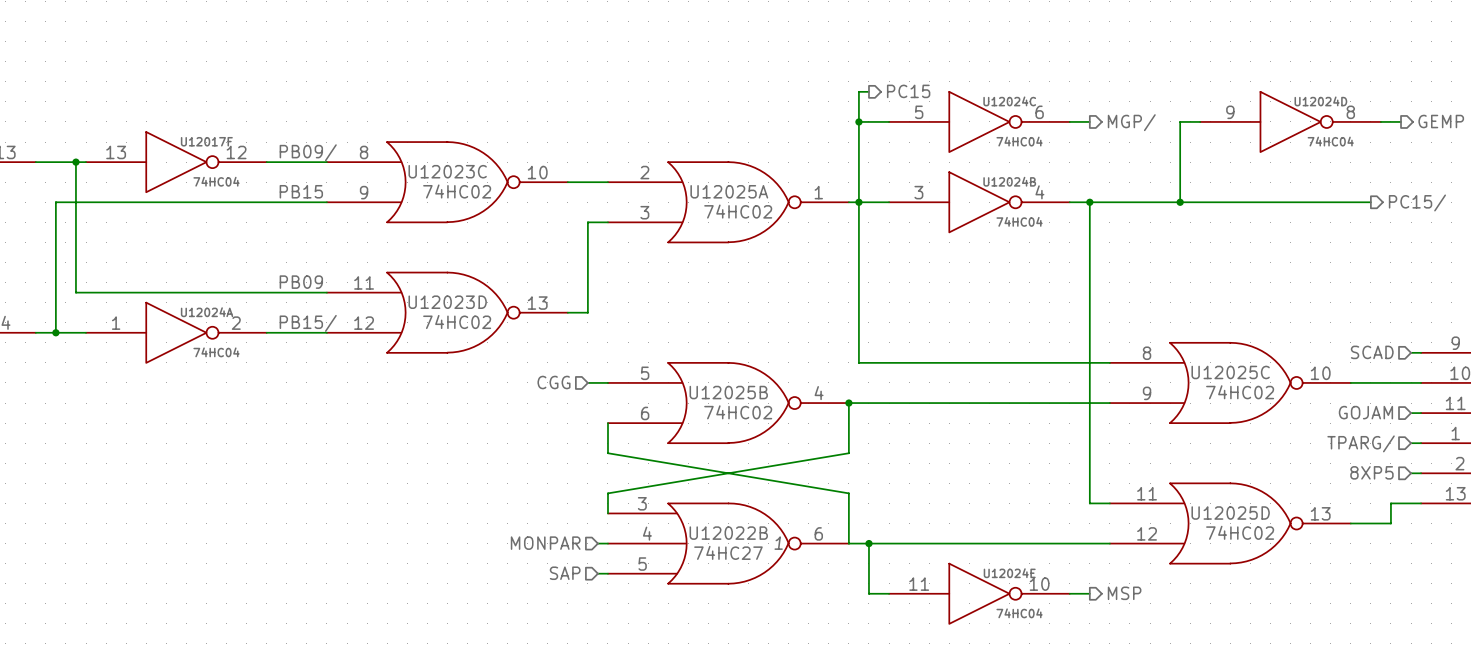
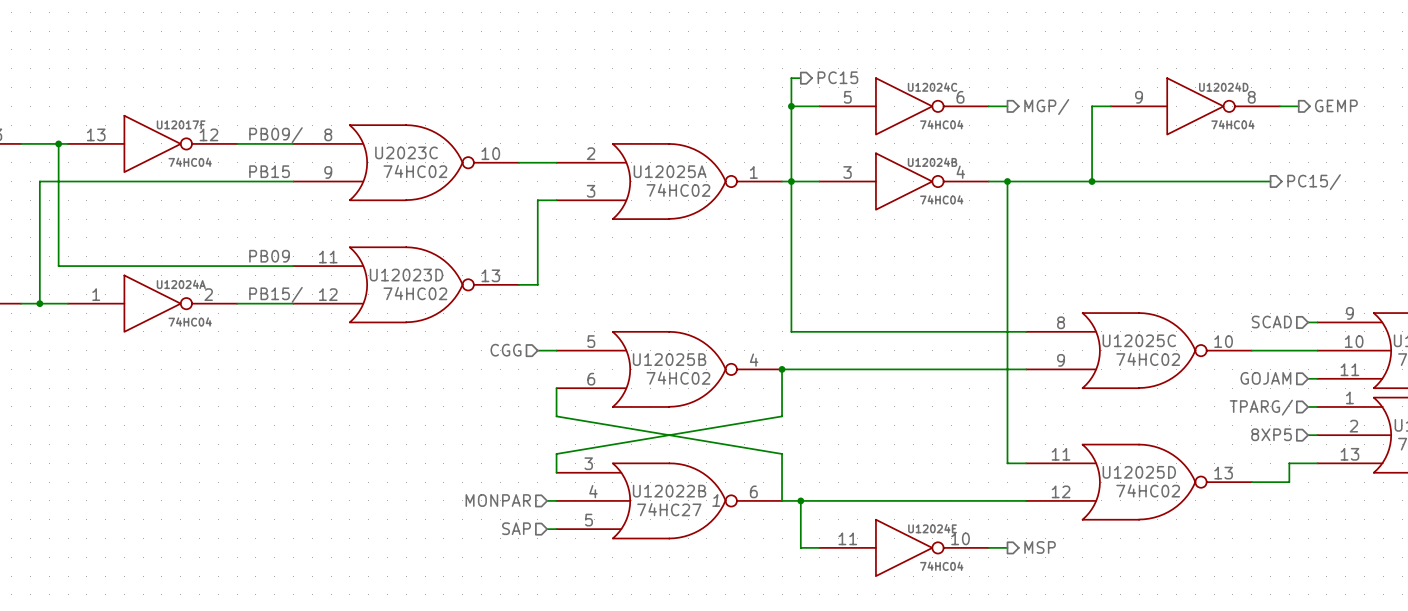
U12023C name: U12023C (447, 171) -> U2023C (406, 152)

